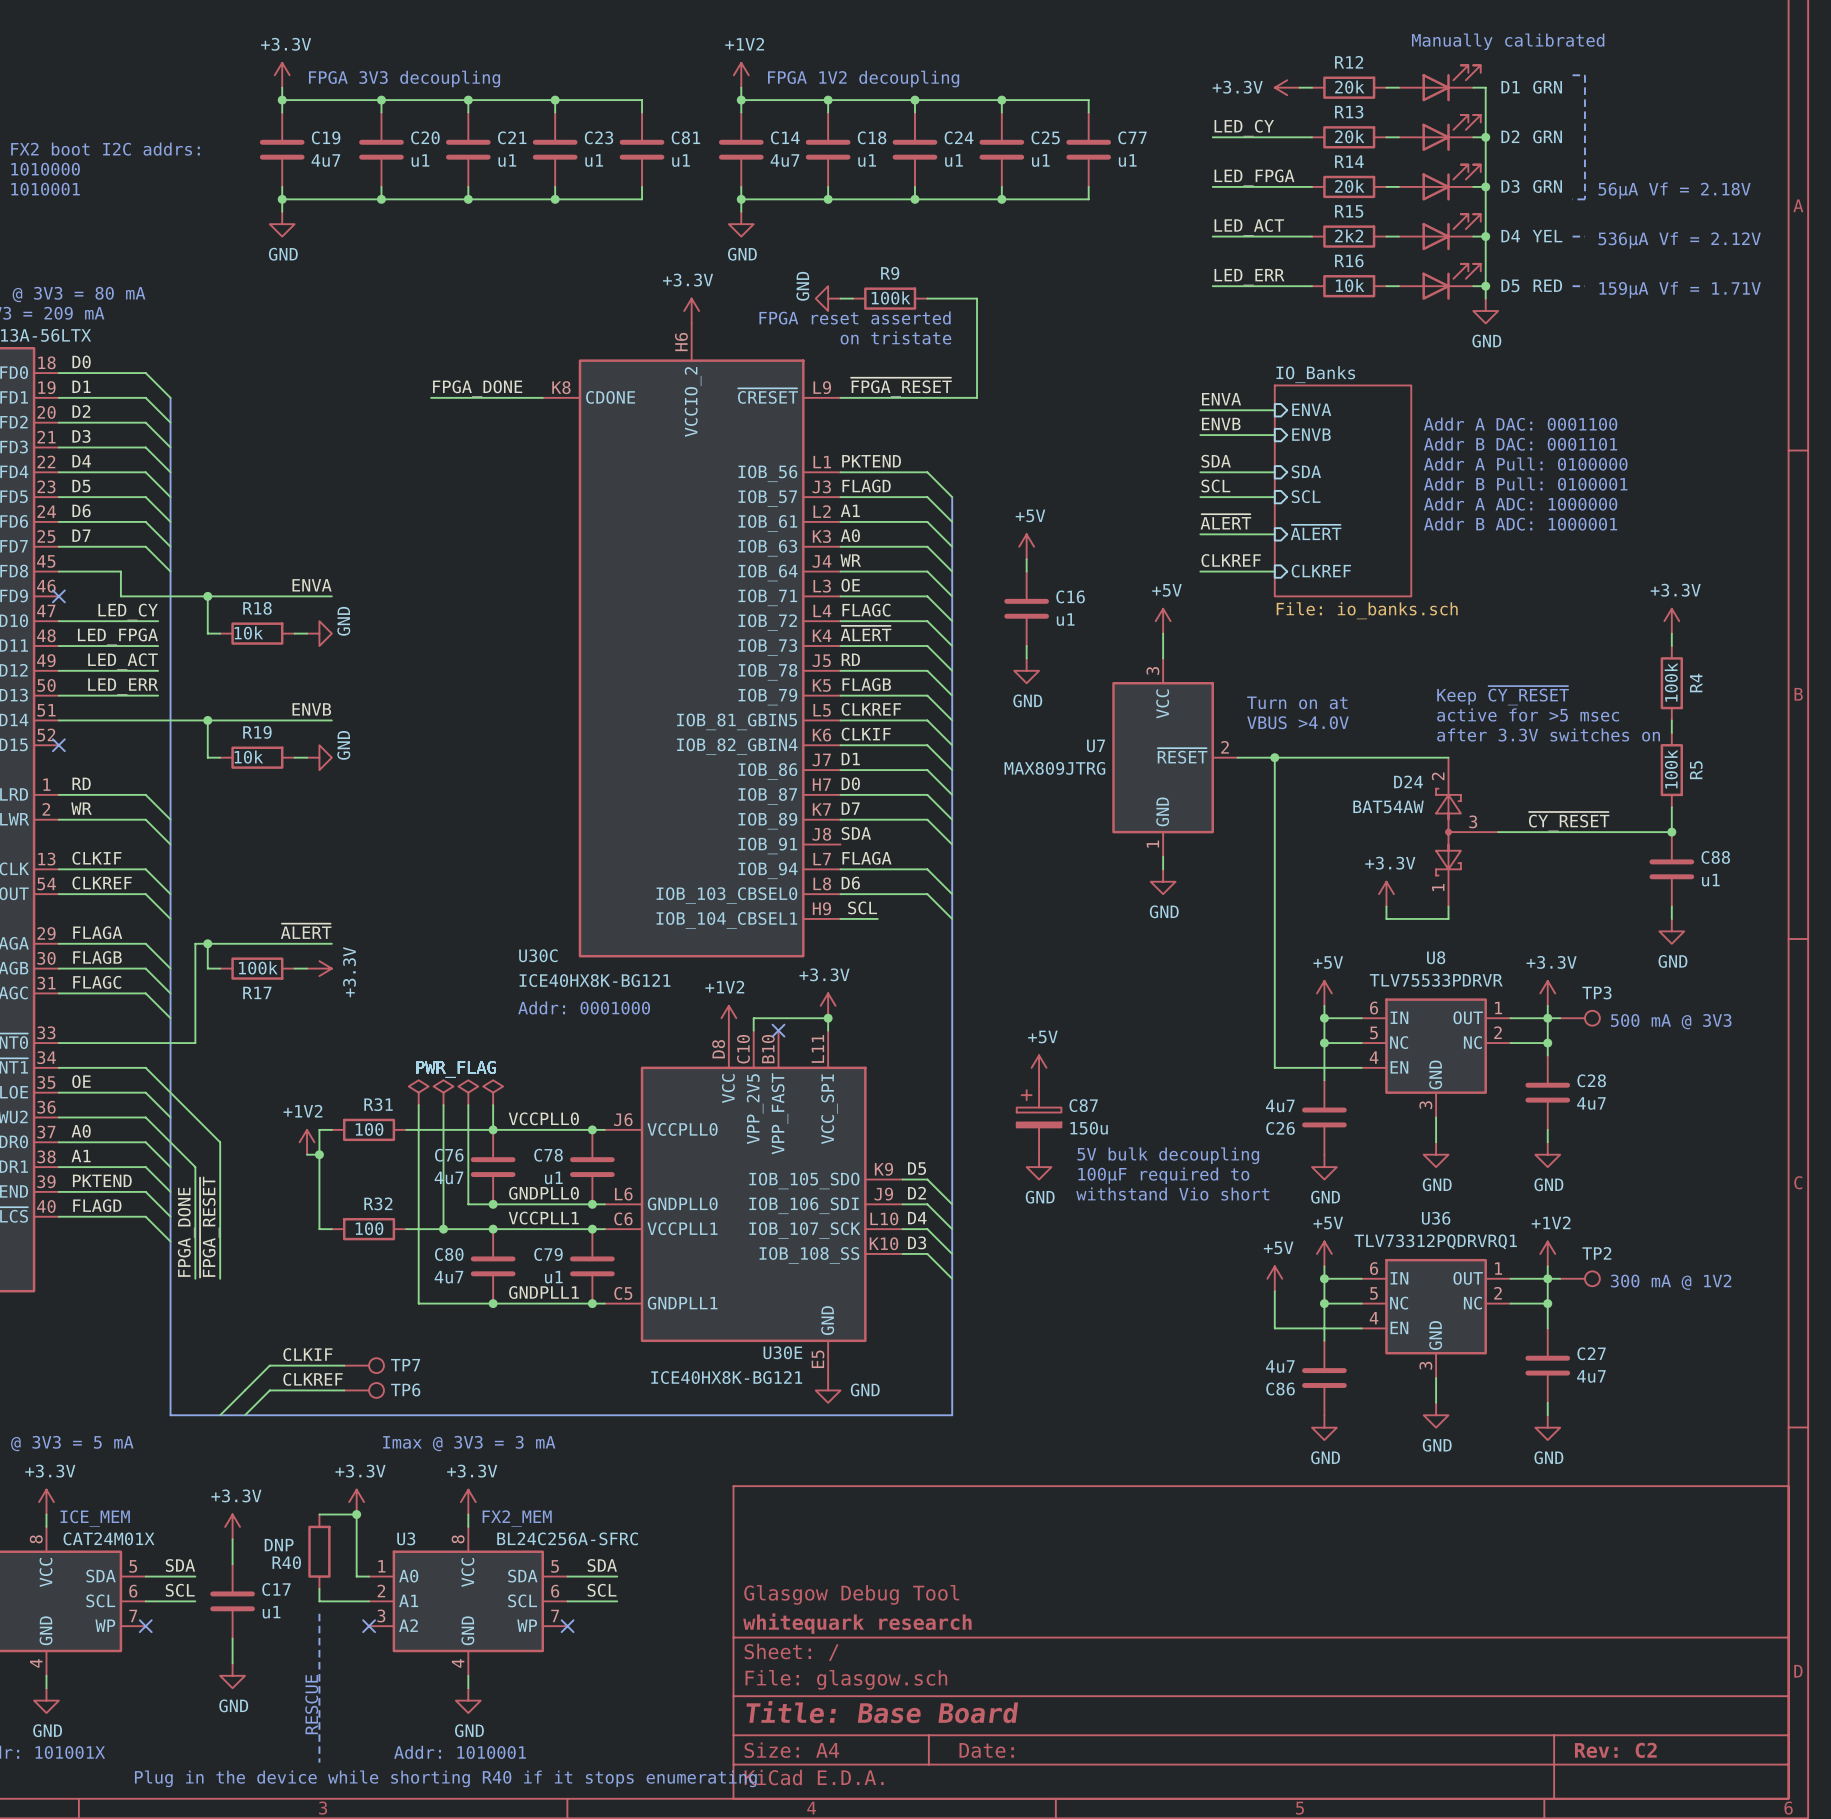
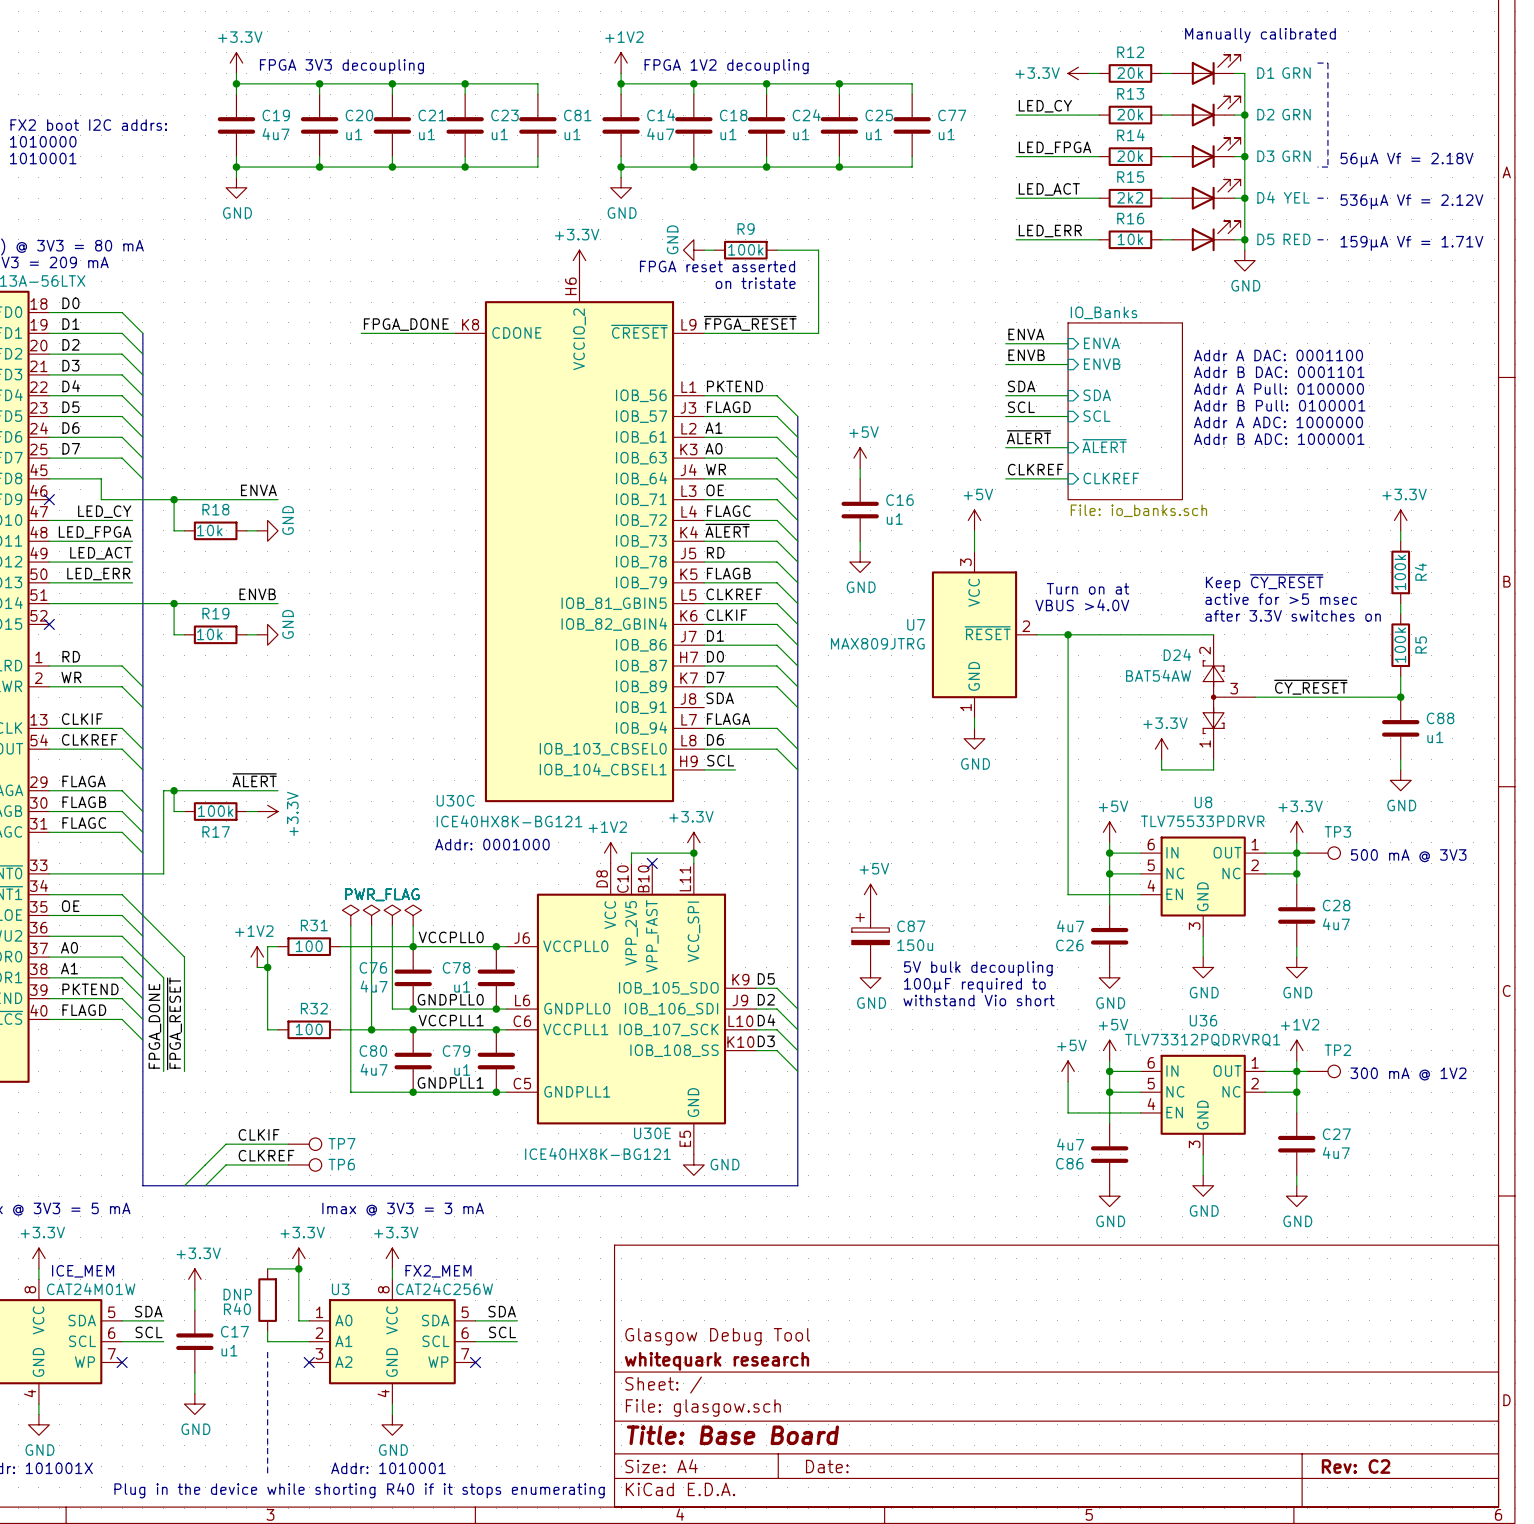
part value: CAT24M01X (109, 1538) -> CAT24M01W (91, 1289)
U3 value: BL24C256A-SFRC (567, 1538) -> CAT24C256W (444, 1289)
text: RESCUE (311, 1704) -> none

